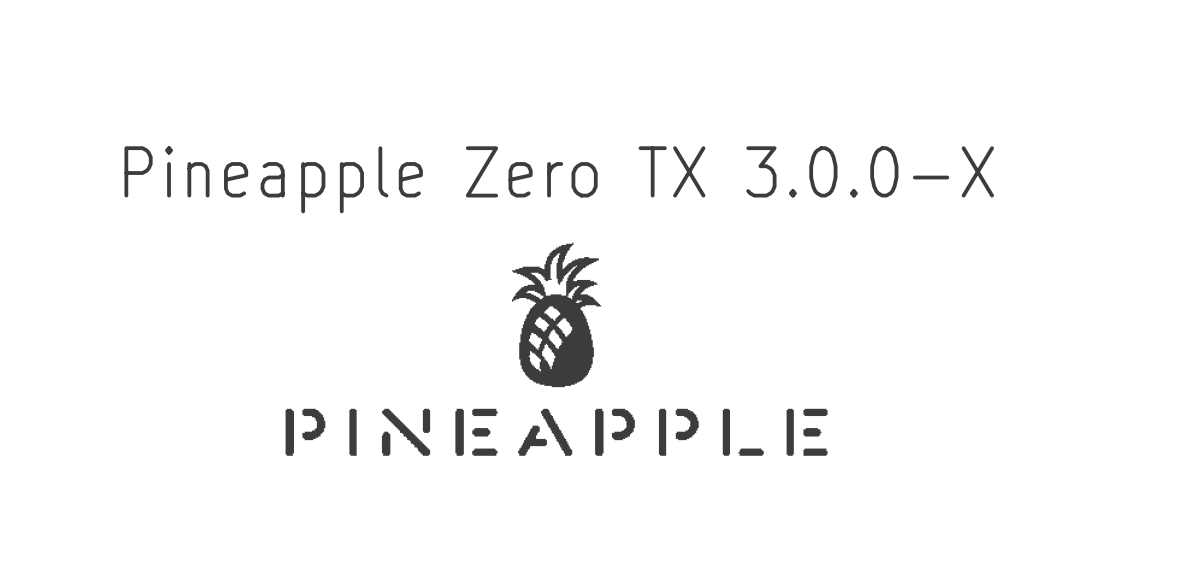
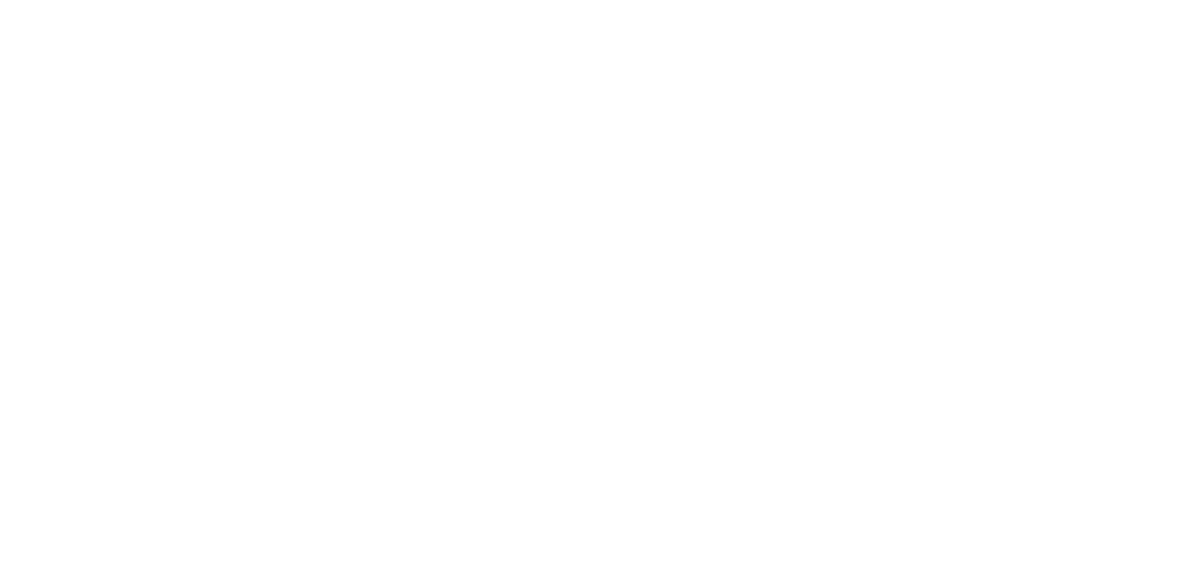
text: Pineapple Zero TX 3.0.0-X (559, 179) -> none
drawing: [285, 242, 828, 456] -> none

